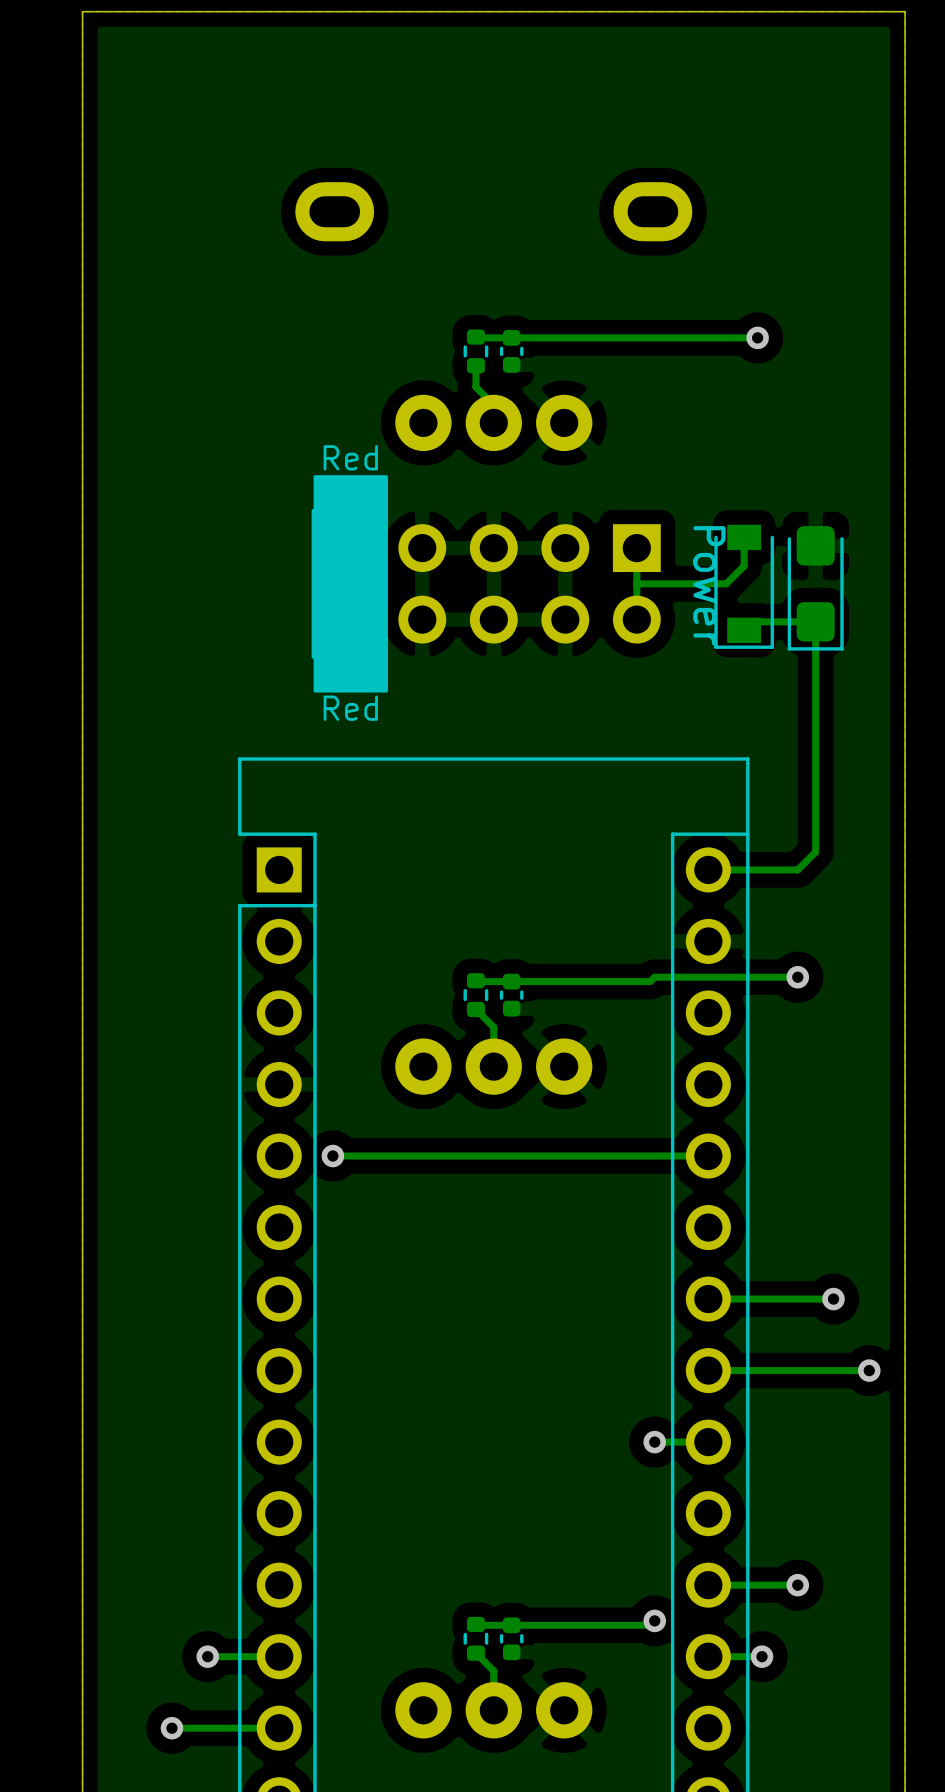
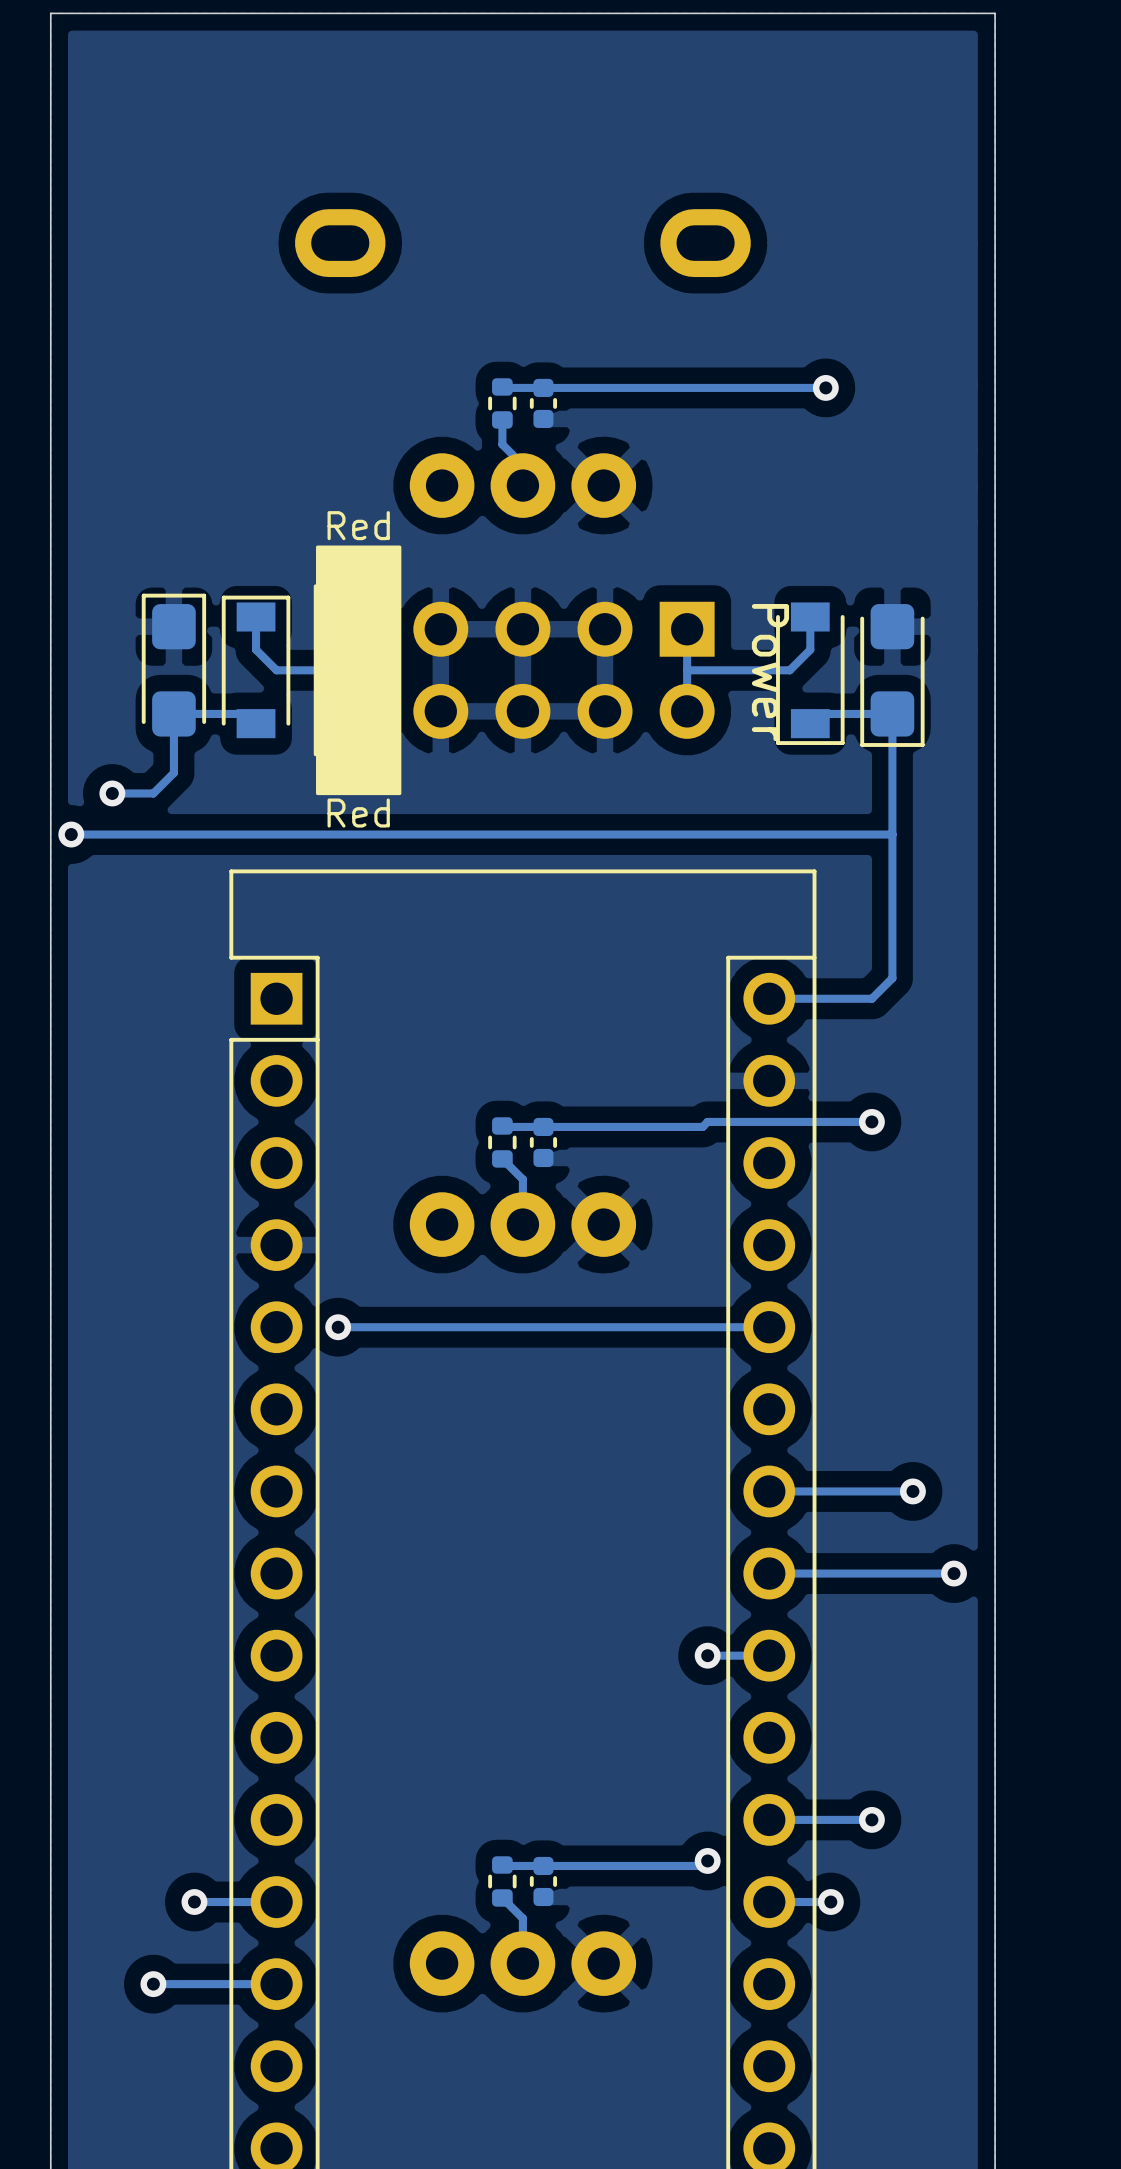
track: none -> (256, 616) (256, 649) (276, 670) (358, 670)
part: none -> (173, 665)
part: none -> (256, 666)
track: none -> (256, 723) (246, 713) (173, 713) (173, 772) (153, 793) (112, 793)
via: none -> (112, 793)
via: none -> (71, 834)
track: none -> (892, 834) (71, 834)

